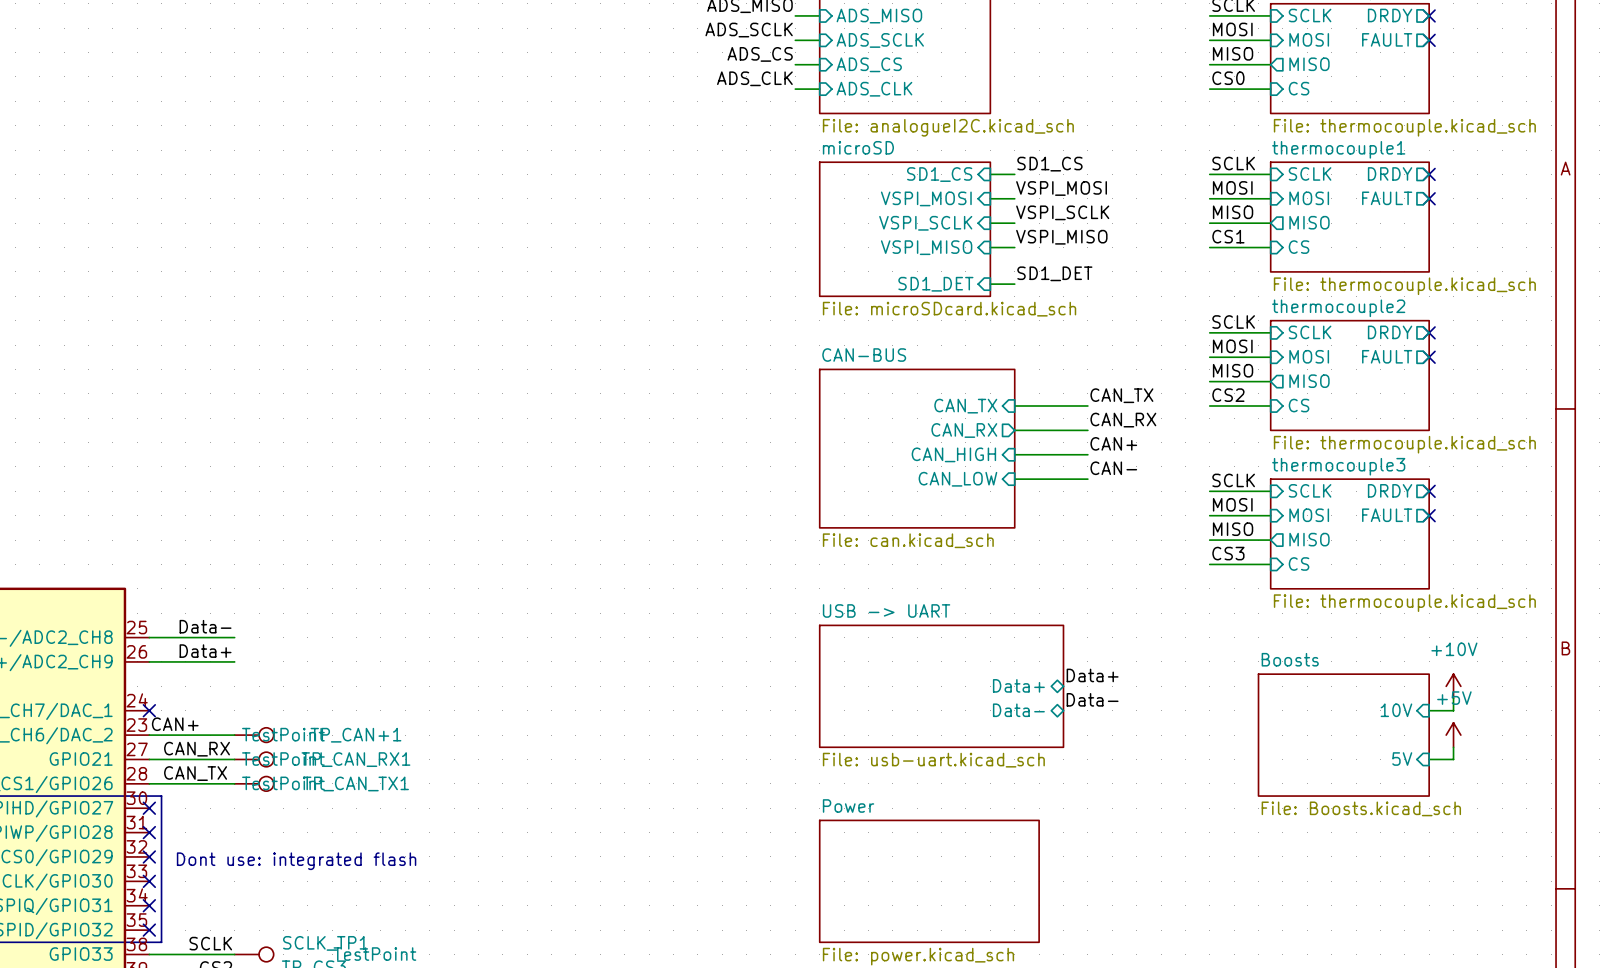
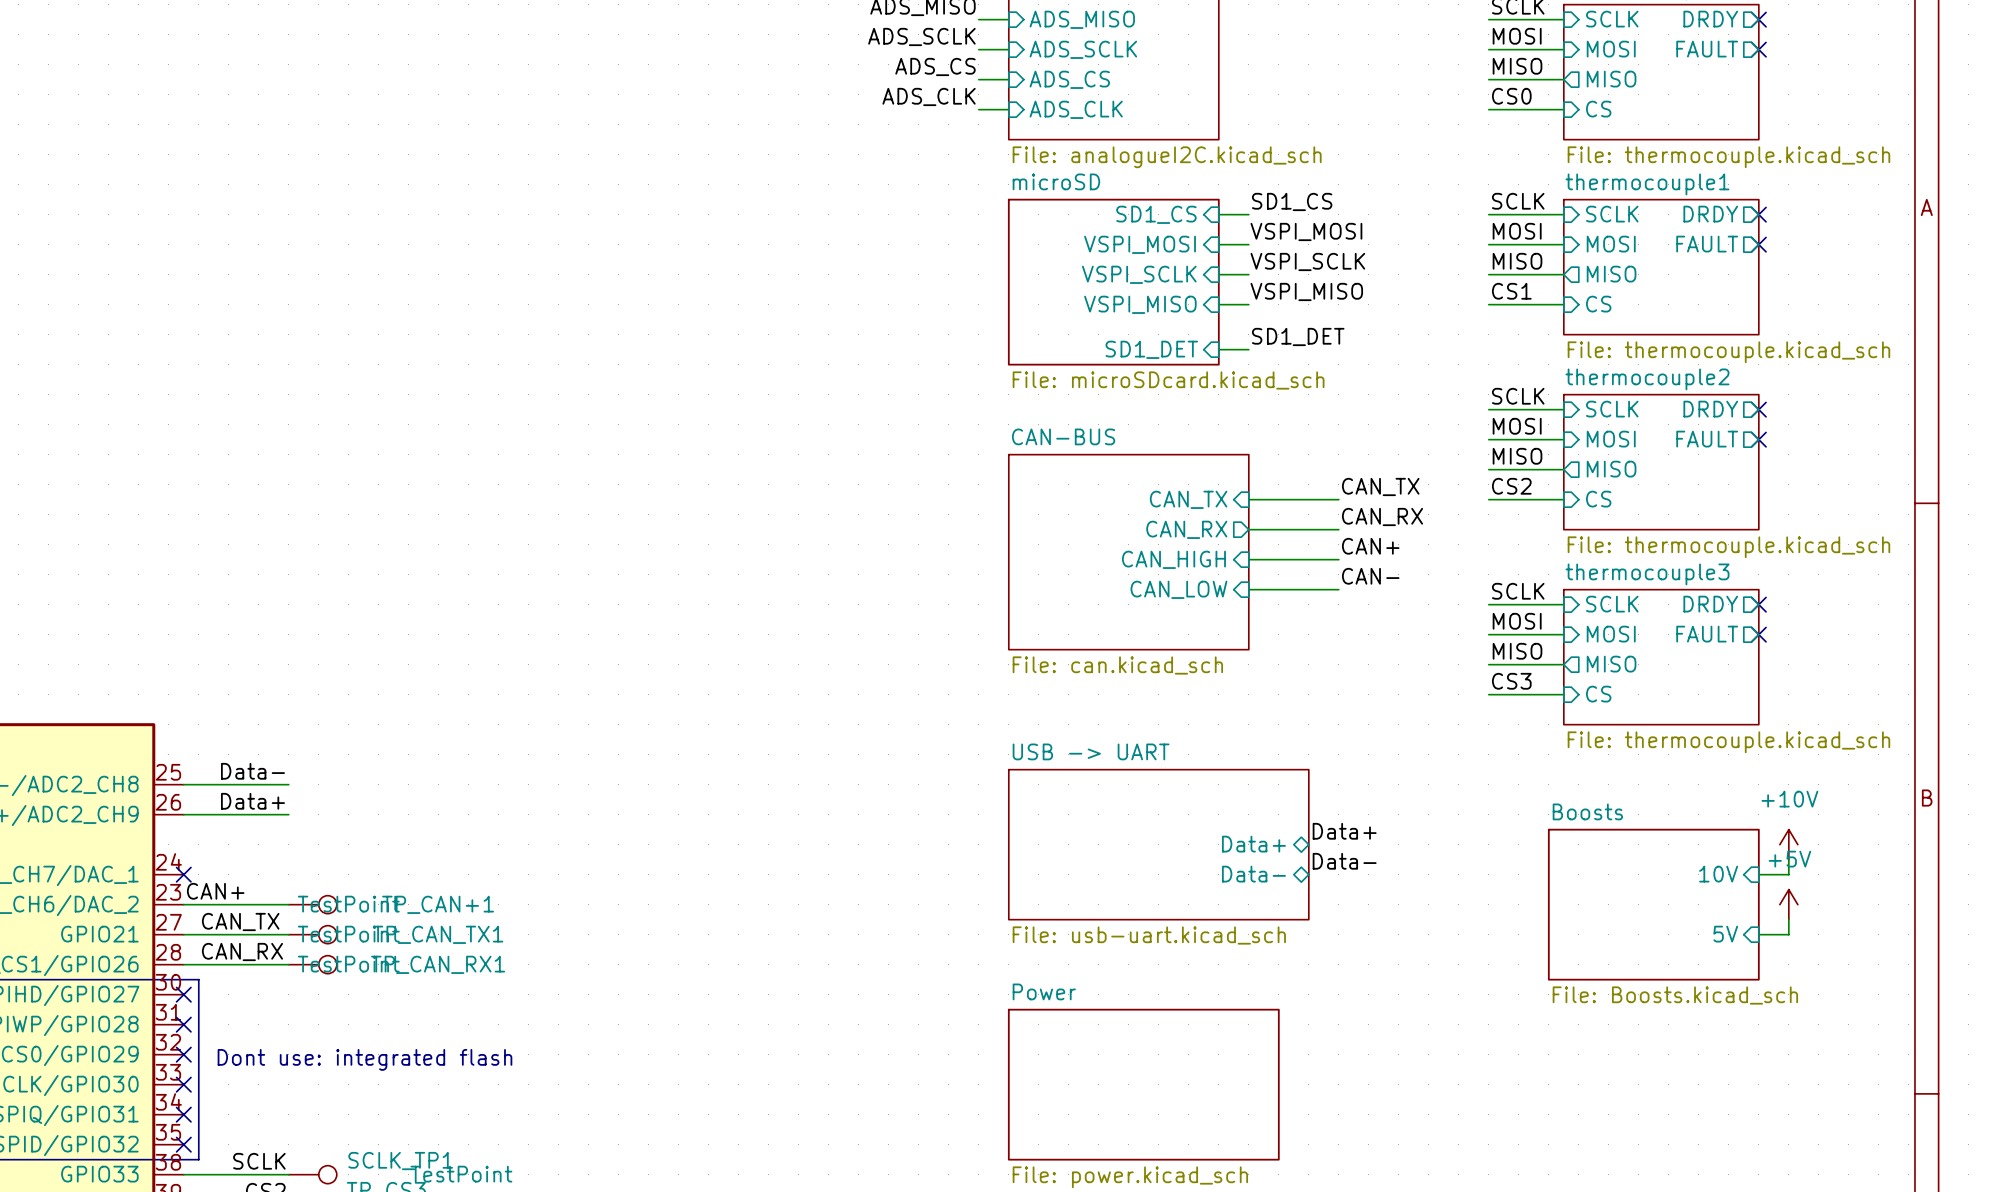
label: CAN_RX (197, 749) -> CAN_TX (240, 922)
TP_CAN_RX1 name: TP_CAN_RX1 (355, 759) -> TP_CAN_TX1 (438, 934)
label: CAN_TX (195, 773) -> CAN_RX (242, 952)
TP_CAN_TX1 name: TP_CAN_TX1 (355, 783) -> TP_CAN_RX1 (438, 964)

